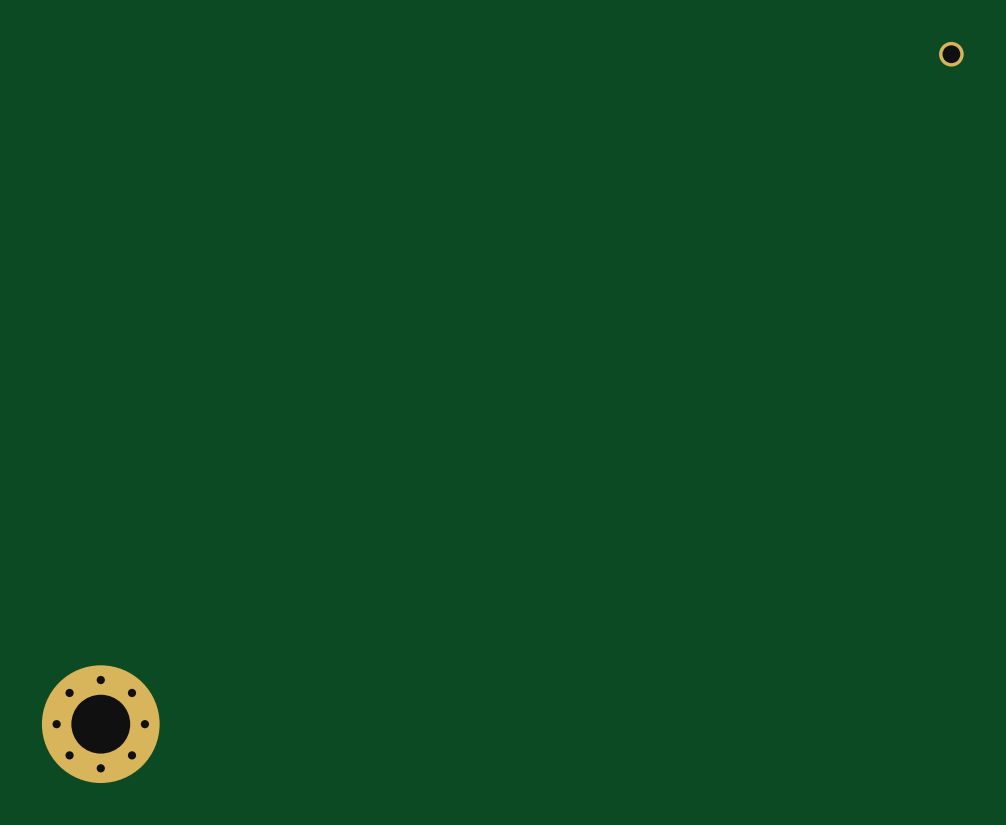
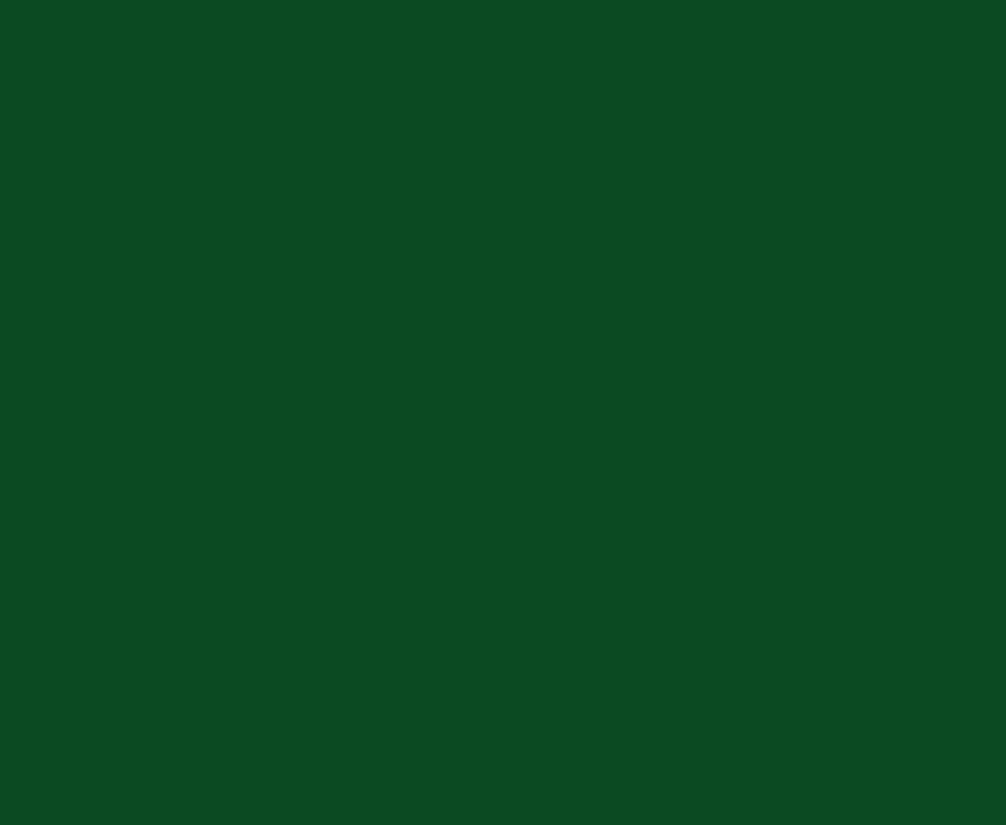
part: (951, 54) -> none
part: (100, 724) -> none

